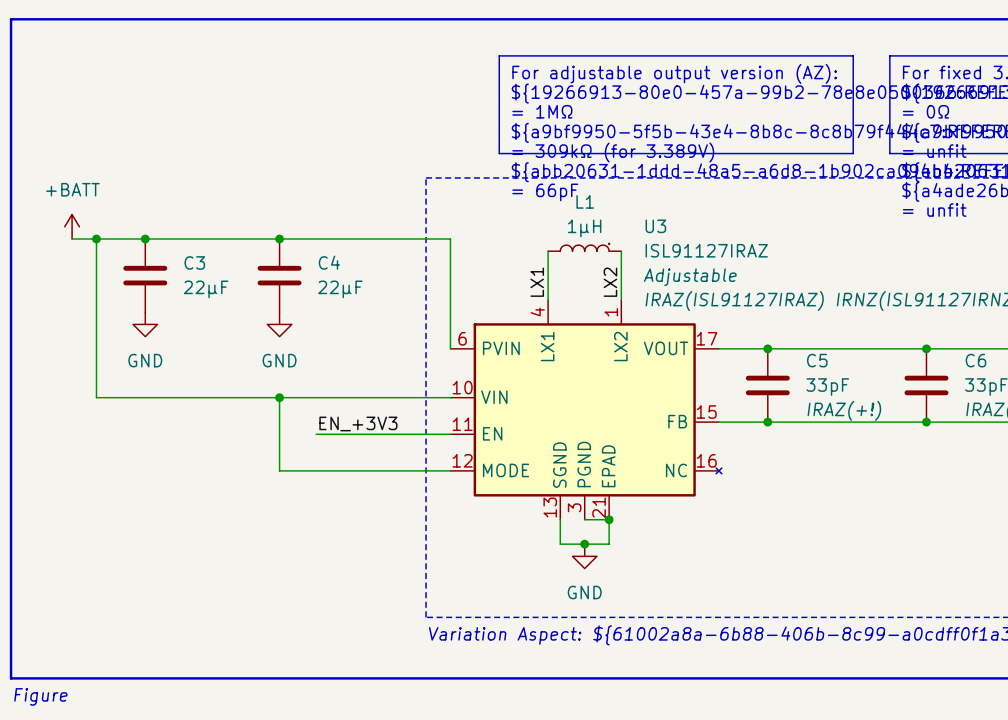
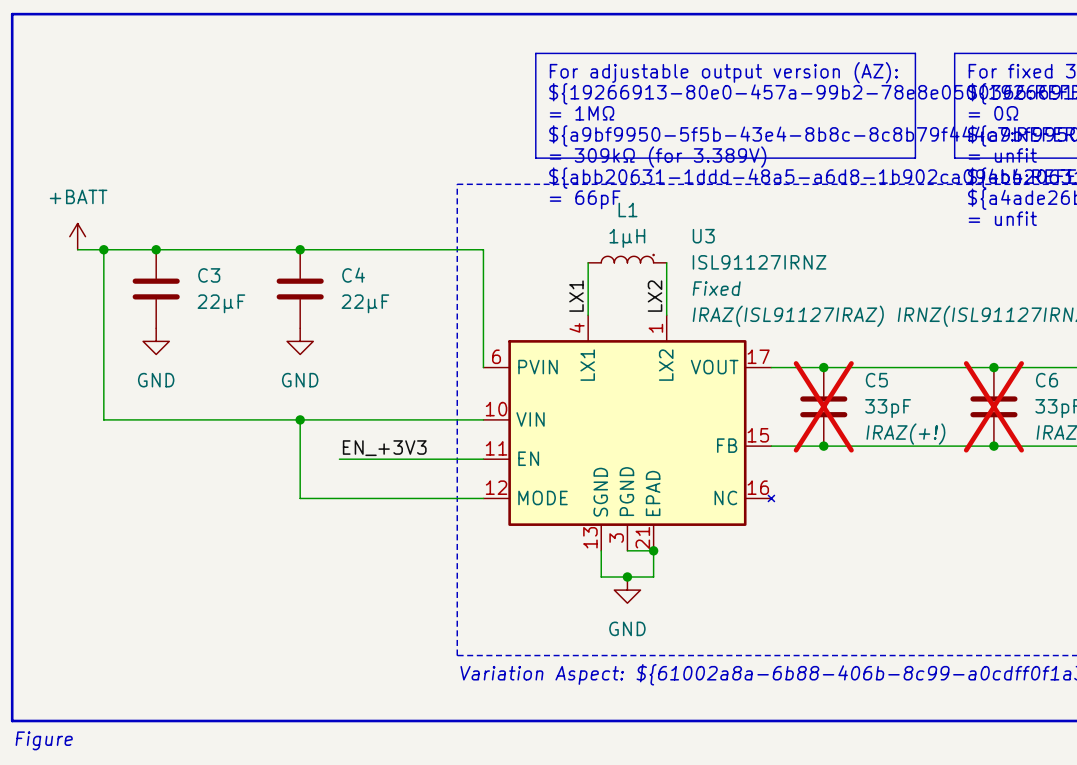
U3 value: ISL91127IRAZ (706, 250) -> ISL91127IRNZ (759, 262)
U3 text: Adjustable (690, 277) -> Fixed (716, 288)
C5 do-not-place cross: none -> (823, 406)
C6 do-not-place cross: none -> (993, 406)

